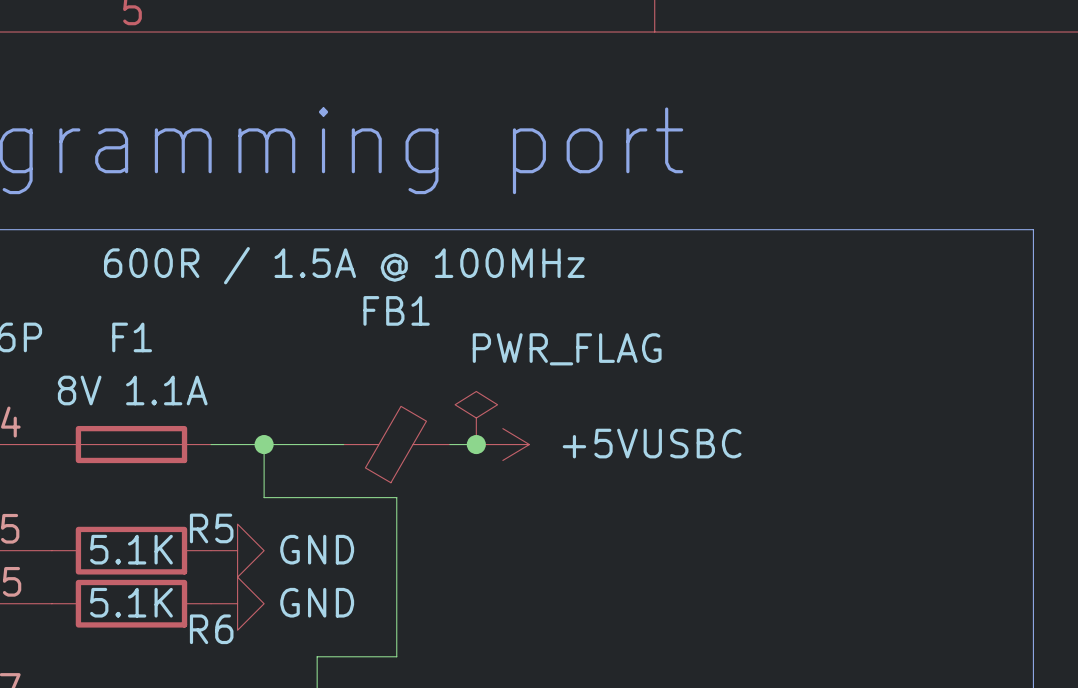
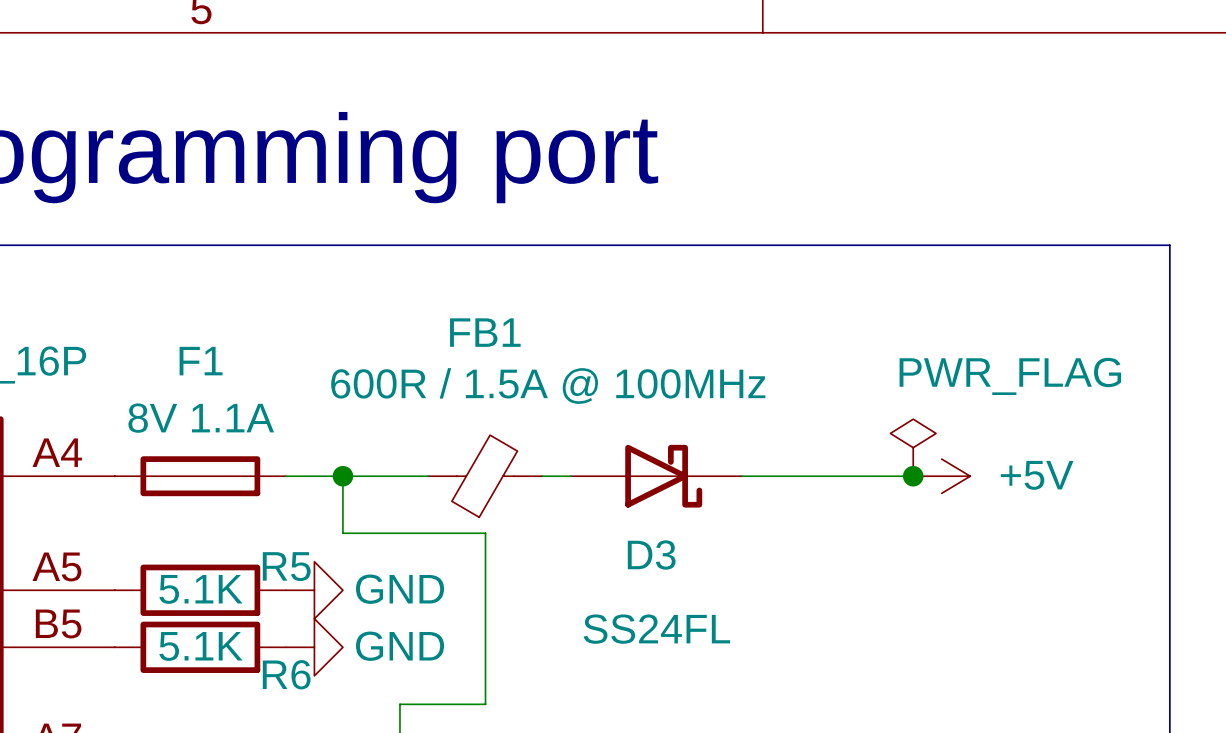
FB1 value position: 600R / 1.5A @ 100MHz (344, 265) -> 600R / 1.5A @ 100MHz (548, 386)
power symbol position: PWR_FLAG (476, 418) -> PWR_FLAG (913, 447)
junction: (476, 444) -> none
power symbol: +5VUSBC (502, 444) -> none
D3: none -> SS24FL (656, 476)
wire: none -> (742, 476) (913, 476)
junction: none -> (913, 476)
power symbol: none -> +5V (941, 476)

